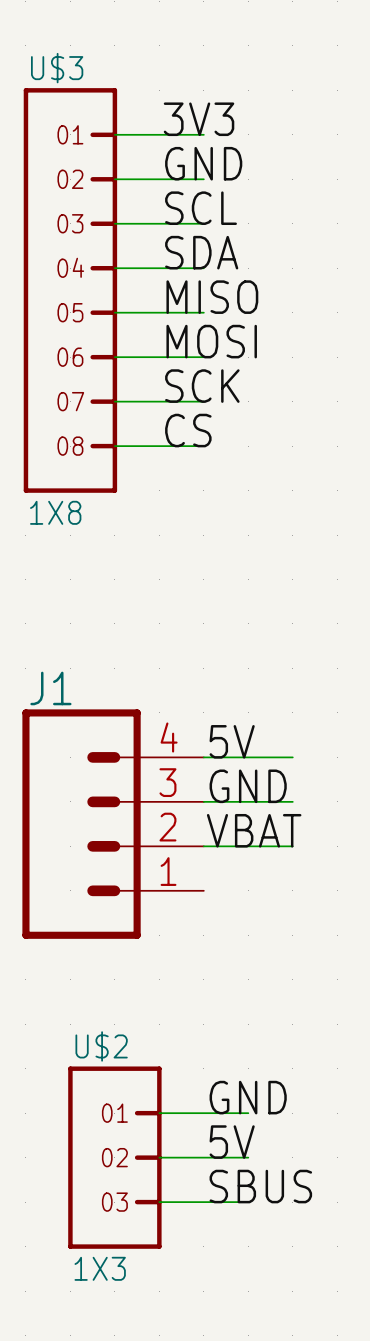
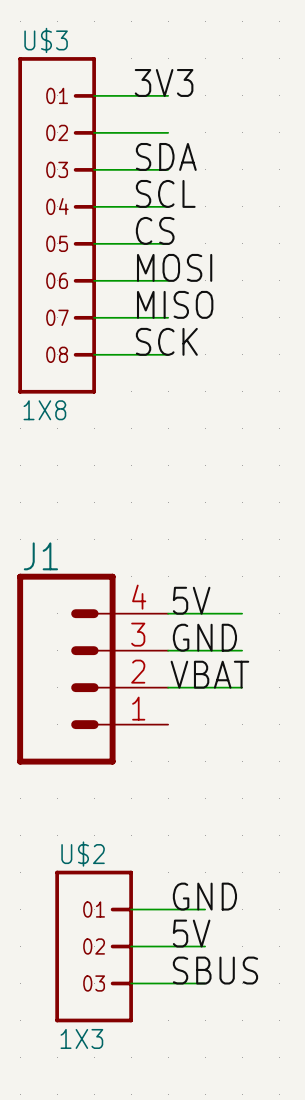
label: GND (203, 163) -> none
label: SCL (201, 208) -> SDA (166, 156)
label: SDA (201, 252) -> SCL (165, 193)
label: MISO (212, 297) -> CS (155, 230)
label: SCK (202, 386) -> MISO (175, 304)
label: CS (188, 430) -> SCK (166, 341)

